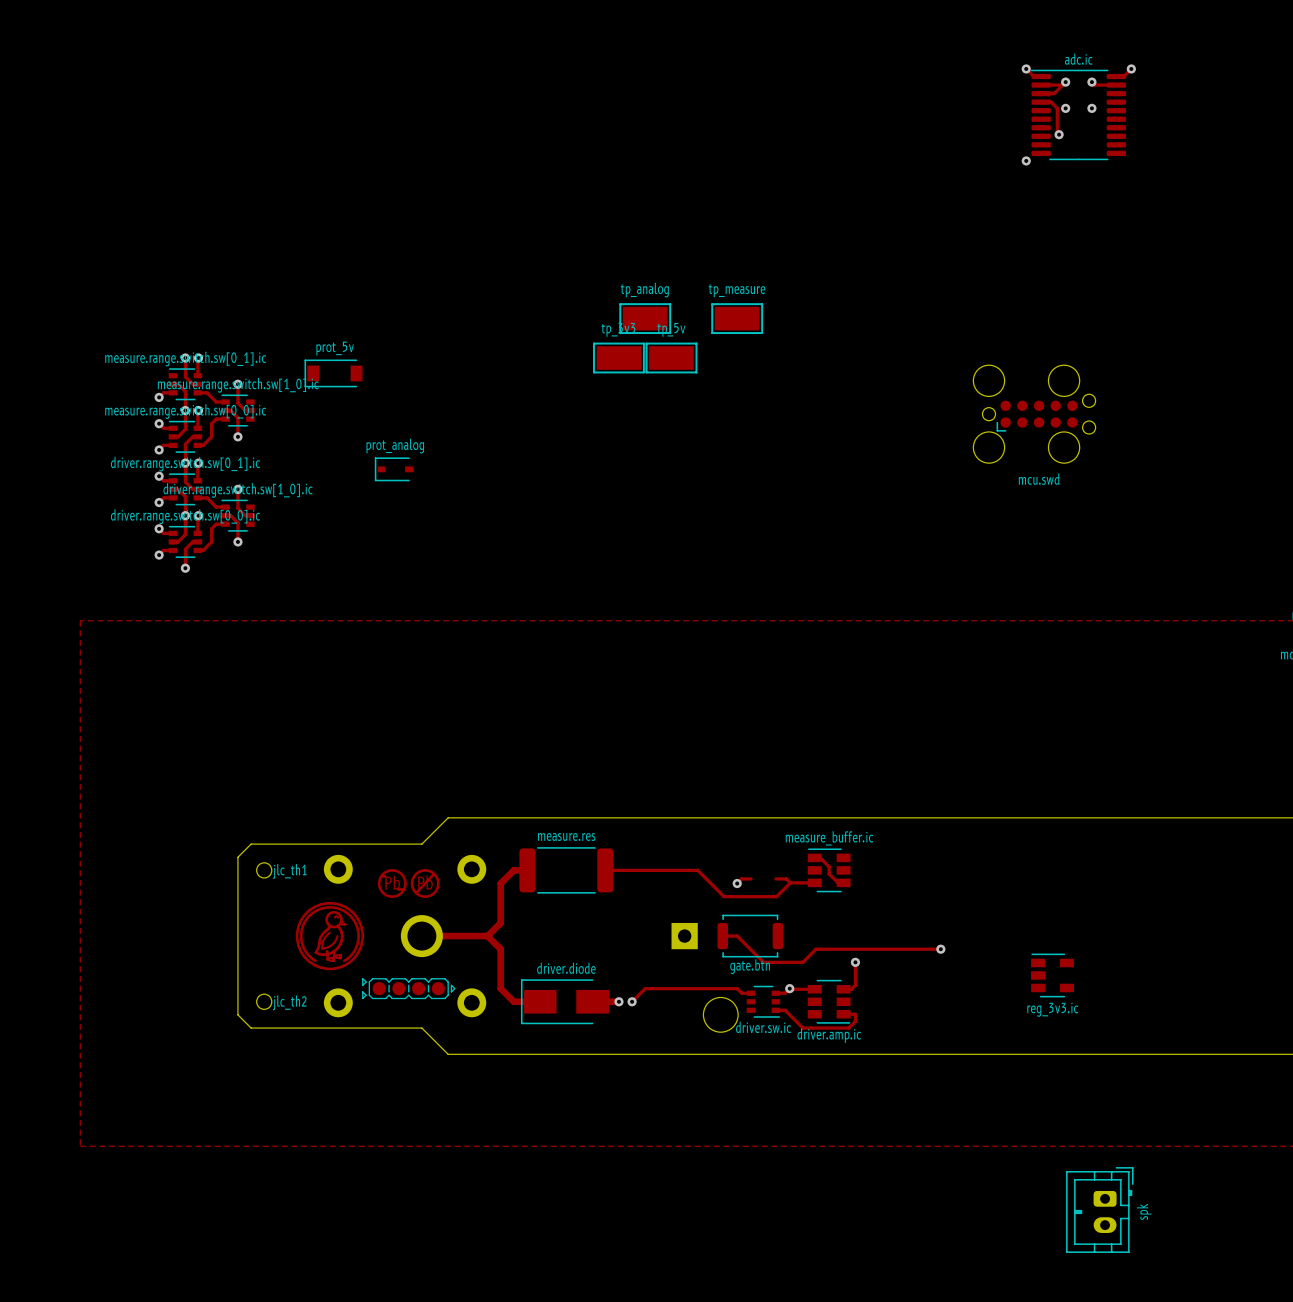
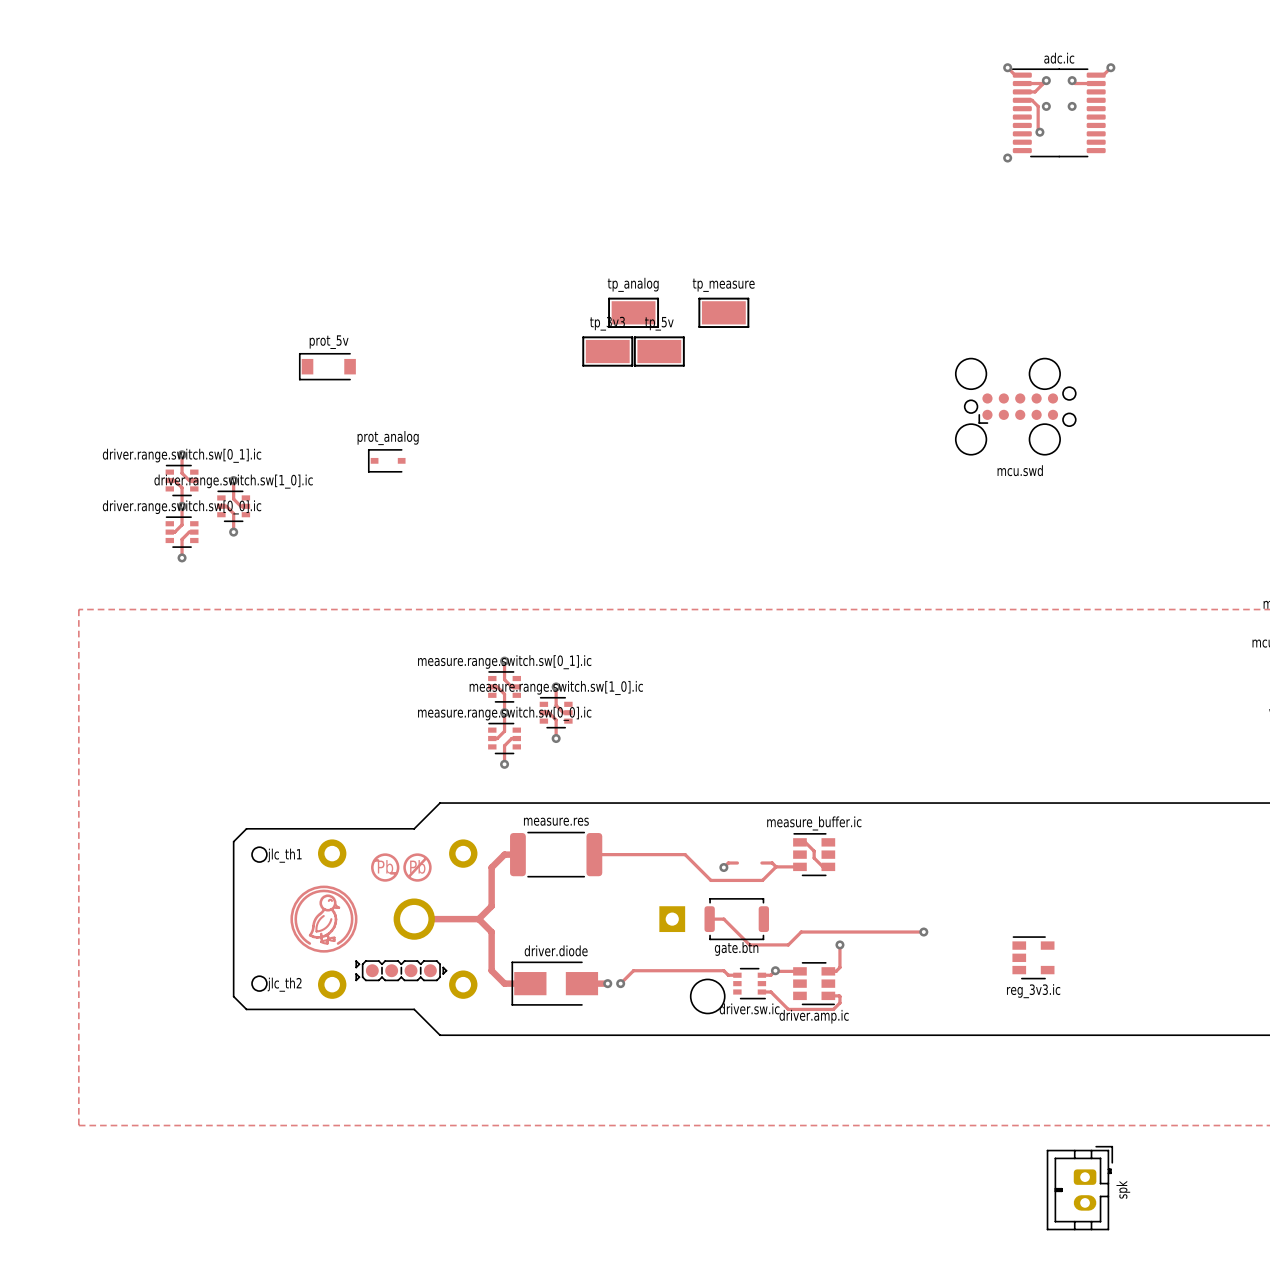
track: (185, 358) (185, 376) (192, 384) (197, 384) -> none
via: (185, 358) -> none
track: (198, 358) (197, 375) -> none
via: (198, 358) -> none
track: (172, 384) (178, 384) (185, 391) (185, 429) (178, 436) (172, 436) -> none
measure.range.switch.sw[0_1].ic position: (185, 384) -> (504, 686)
track: (237, 384) (237, 403) (245, 410) (250, 410) -> none
via: (237, 384) -> none
track: (172, 392) (163, 392) (159, 397) -> none
track: (197, 392) (207, 392) (216, 402) (225, 402) -> none
via: (159, 397) -> none
via: (185, 410) -> none
track: (198, 410) (197, 428) -> none
via: (198, 410) -> none
track: (225, 410) (230, 410) (237, 417) (237, 436) -> none
measure.range.switch.sw[1_0].ic position: (237, 410) -> (556, 712)
track: (225, 419) (216, 419) (211, 423) (211, 436) (203, 445) (197, 445) -> none
track: (159, 423) (163, 428) (172, 428) -> none
via: (159, 423) -> none
measure.range.switch.sw[0_0].ic position: (185, 436) -> (504, 738)
track: (197, 436) (192, 436) (185, 444) (185, 463) -> none
via: (237, 436) -> none
track: (172, 445) (163, 445) (159, 449) -> none
via: (159, 449) -> none
track: (198, 463) (197, 480) -> none
via: (198, 463) -> none
track: (159, 476) (163, 480) (172, 480) -> none
via: (159, 476) -> none
track: (172, 497) (163, 497) (159, 502) -> none
track: (197, 497) (207, 497) (216, 507) (225, 507) -> none
via: (159, 502) -> none
track: (198, 515) (197, 533) -> none
via: (198, 515) -> none
track: (225, 524) (216, 524) (211, 528) (211, 541) (203, 550) (197, 550) -> none
track: (159, 528) (163, 533) (172, 533) -> none
via: (159, 528) -> none
track: (172, 550) (163, 550) (159, 555) -> none
via: (159, 555) -> none
track: none -> (504, 661) (504, 679) (511, 686) (516, 686)
via: none -> (504, 661)
track: none -> (492, 686) (497, 686) (504, 694) (504, 731) (497, 738) (492, 738)
track: none -> (556, 686) (556, 705) (563, 712) (568, 712)
via: none -> (556, 686)
via: none -> (504, 712)
track: none -> (543, 712) (548, 712) (556, 719) (556, 738)
track: none -> (516, 738) (511, 738) (504, 745) (504, 764)
via: none -> (556, 738)
via: none -> (504, 764)

